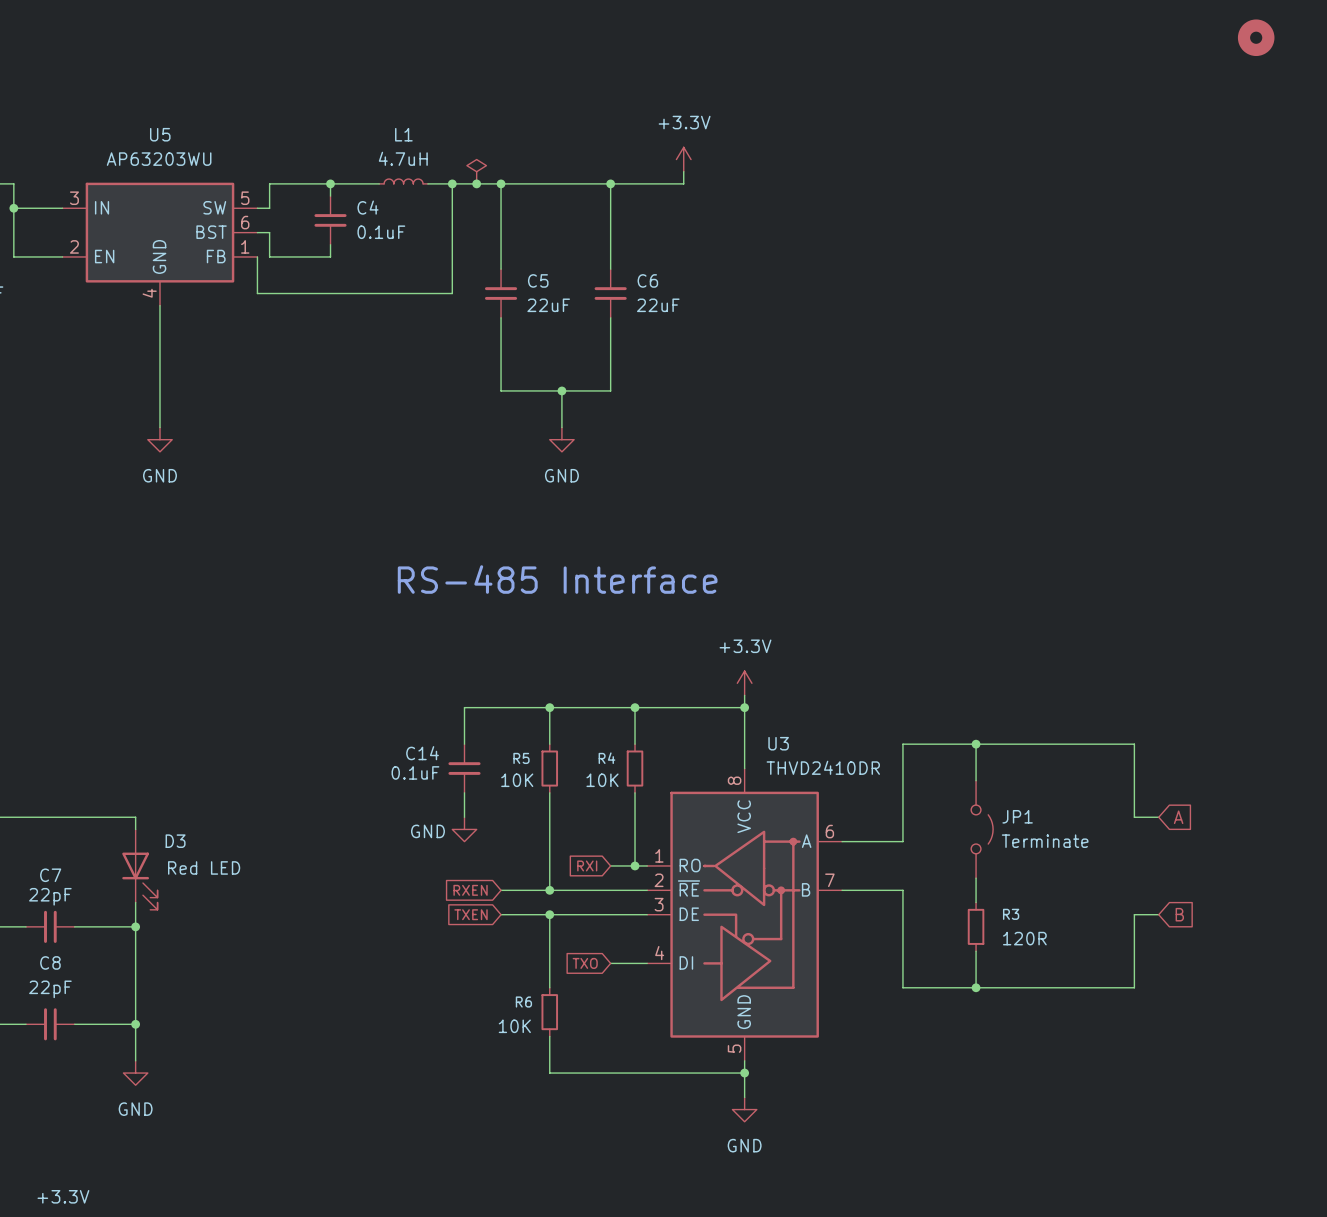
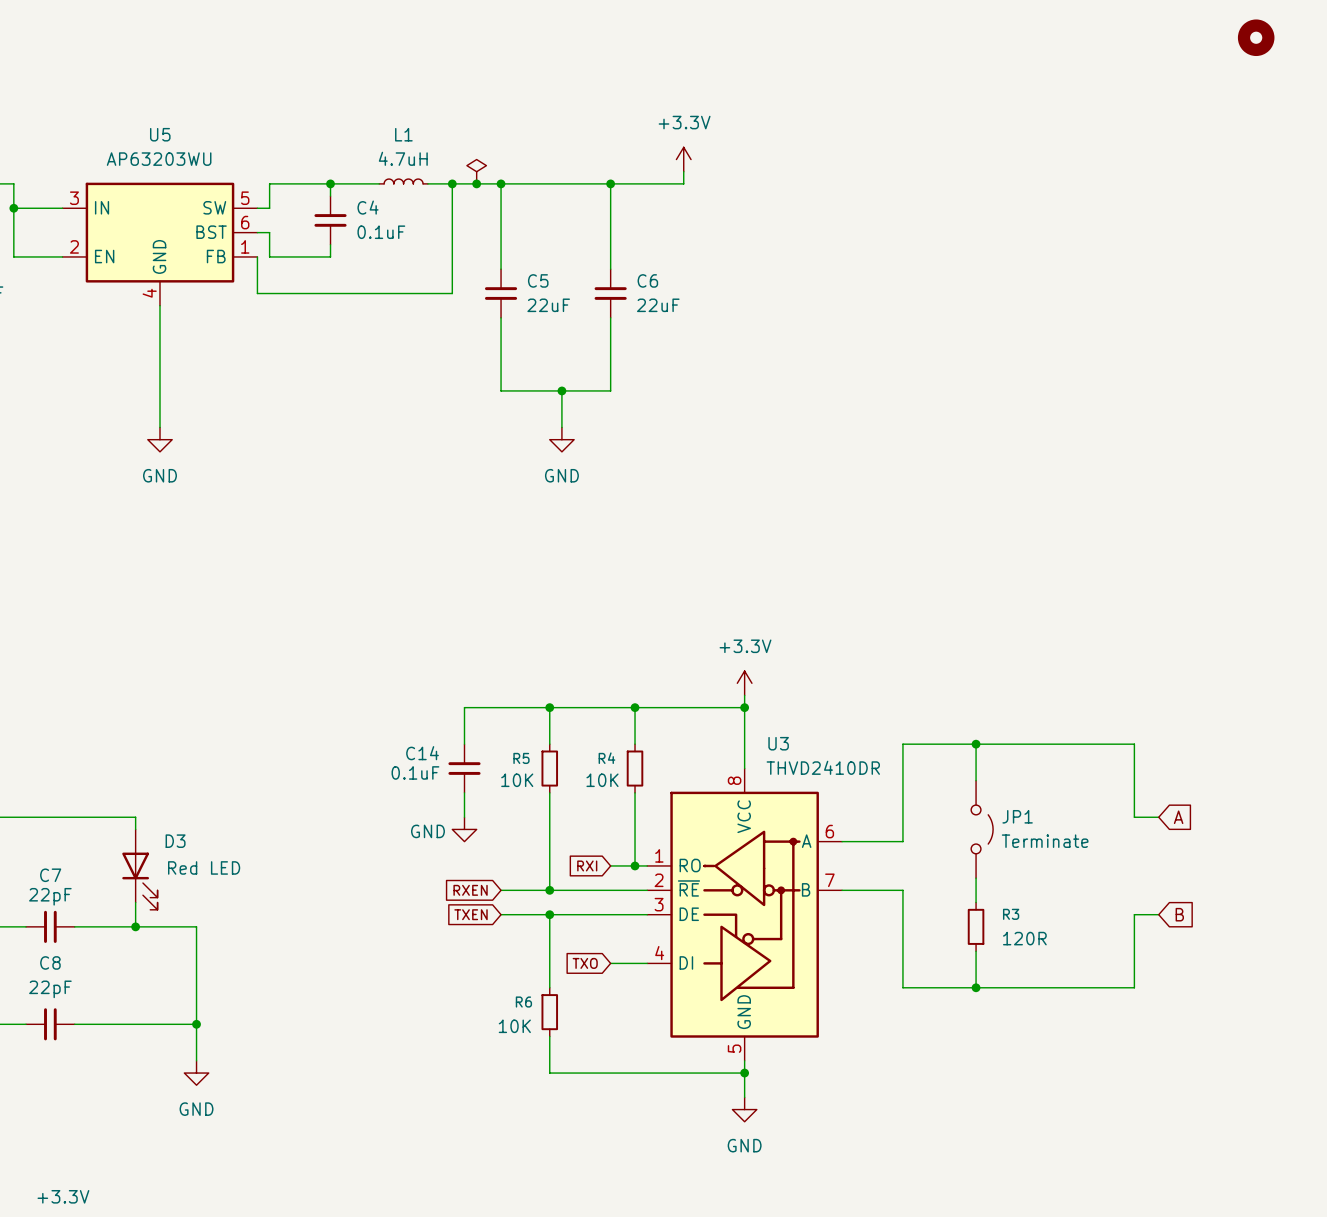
text: RS-485 Interface (557, 579) -> none
wire: (135, 926) (135, 1060) -> (135, 926) (196, 926) (196, 1060)
wire: none -> (135, 1024) (196, 1024)
junction: (135, 1024) -> none
junction: none -> (196, 1024)
power symbol position: GND (135, 1073) -> GND (196, 1073)

